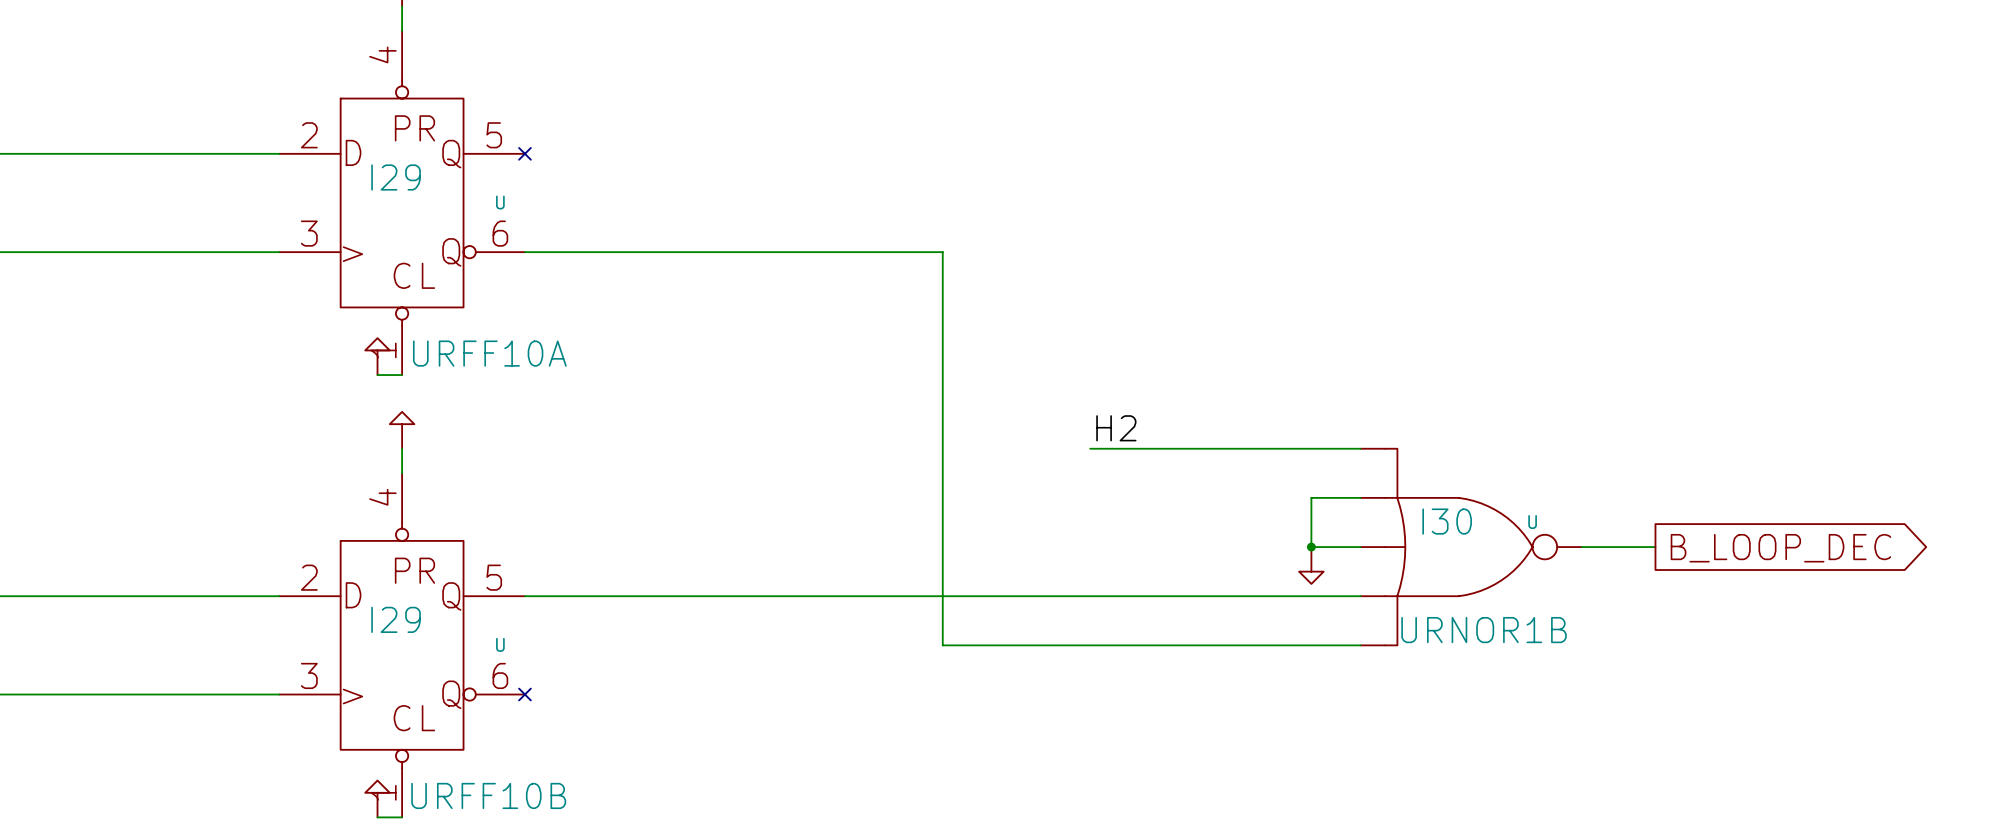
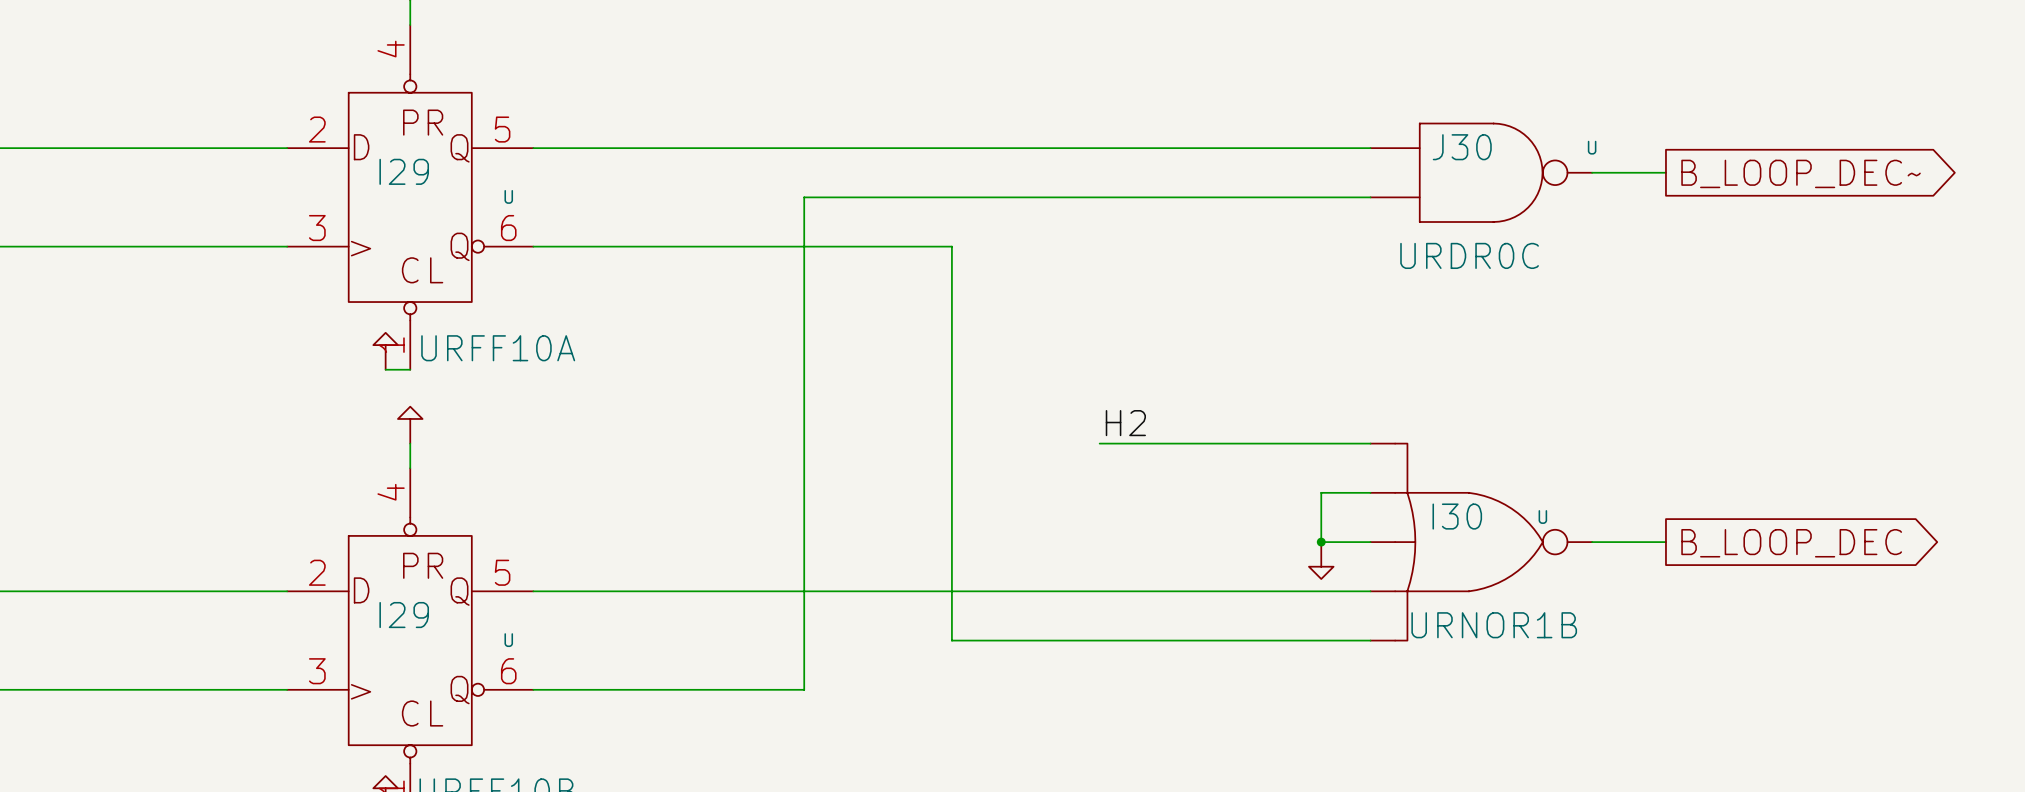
wire: none -> (533, 148) (1370, 148)
no-connect mark: (524, 153) -> none
U: none -> (1481, 172)
wire: none -> (1592, 172) (1665, 172)
global label: none -> B_LOOP_DEC~ (1801, 173)
wire: none -> (1370, 197) (804, 197) (804, 689) (533, 689)
no-connect mark: (524, 694) -> none

